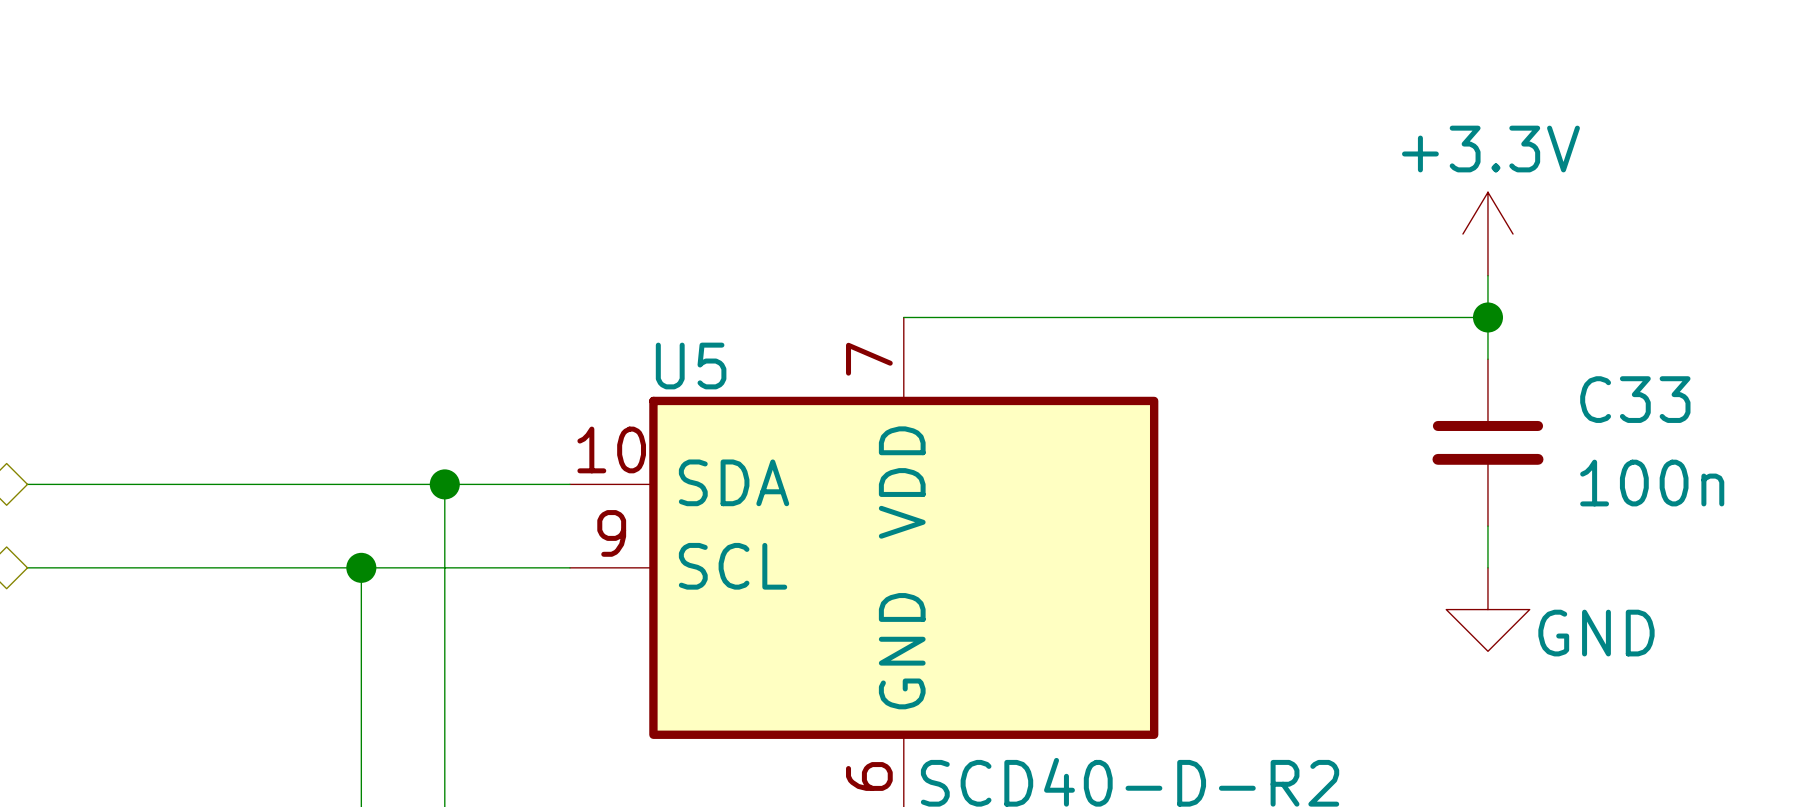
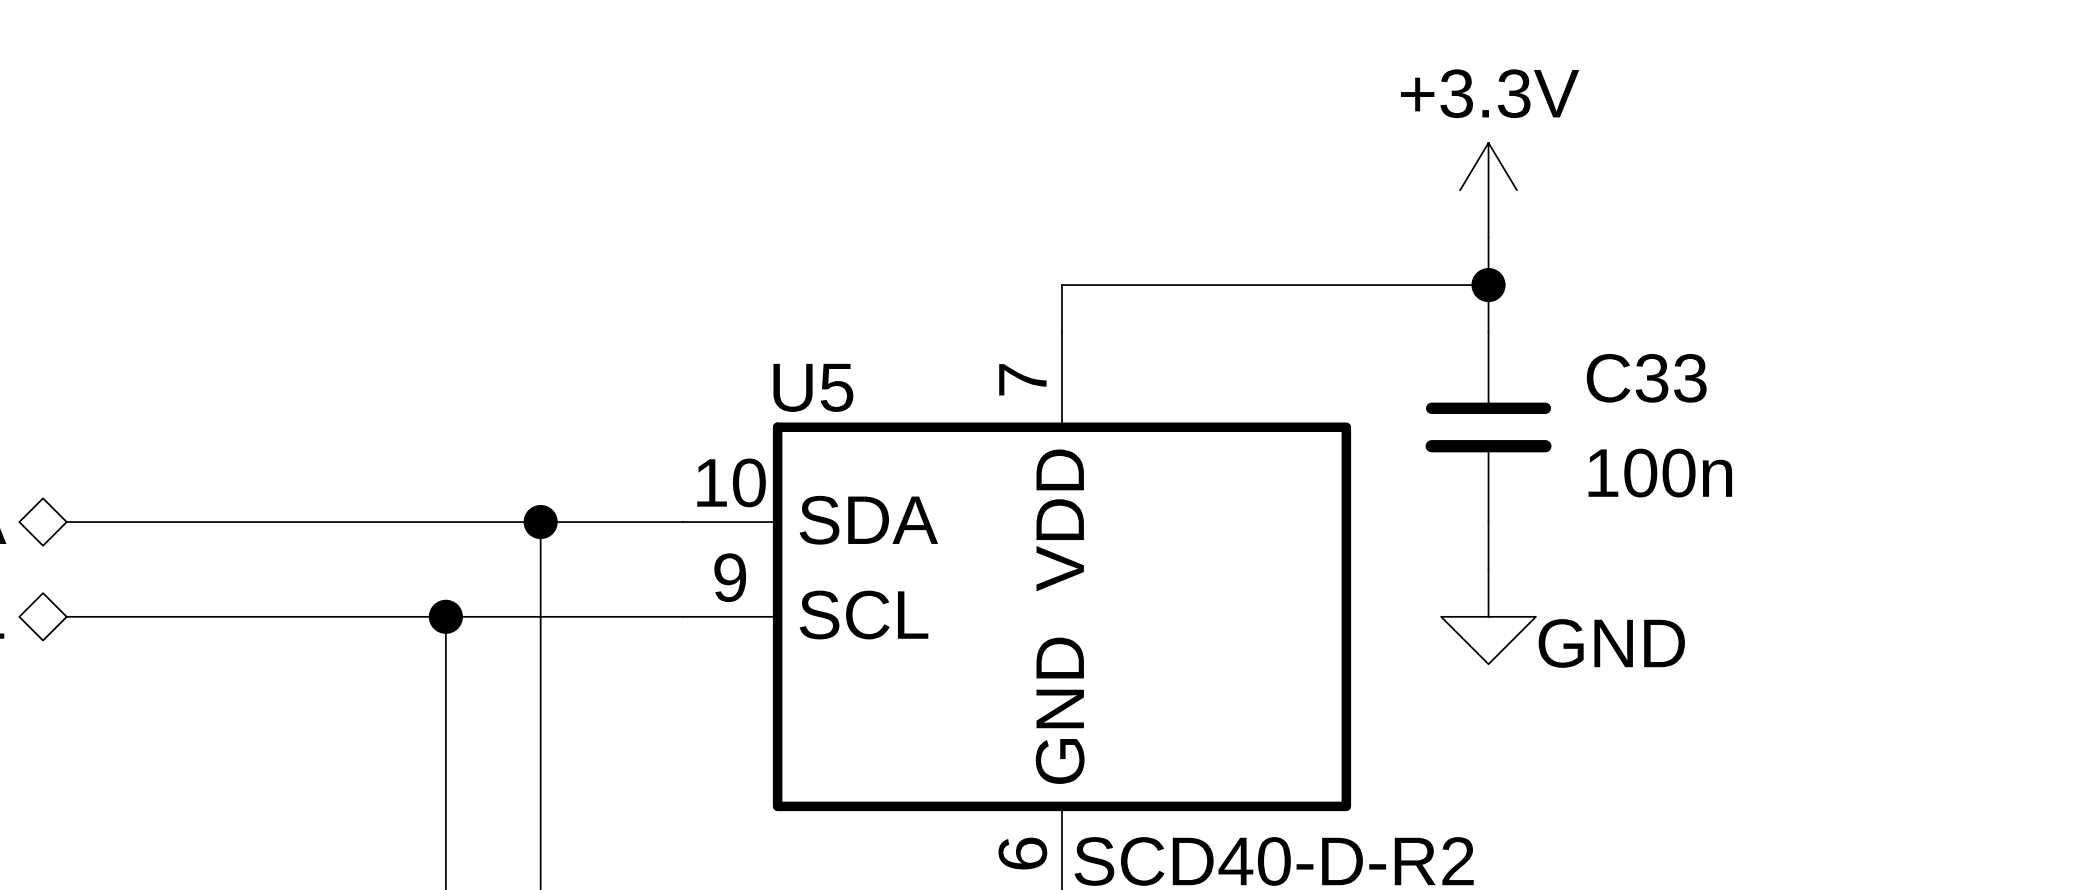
power symbol position: +3.3V (1487, 234) -> +3.3V (1488, 190)
junction: none -> (1488, 285)
wire: (1487, 275) (1487, 359) -> (1488, 237) (1488, 332)
wire: (903, 317) (1487, 317) -> (1061, 332) (1061, 285) (1488, 285)
junction: (1487, 317) -> none
C33 position: (1487, 442) -> (1488, 427)
wire: (1487, 526) (1487, 567) -> (1488, 522) (1488, 569)
power symbol position: GND (1487, 609) -> GND (1488, 616)

